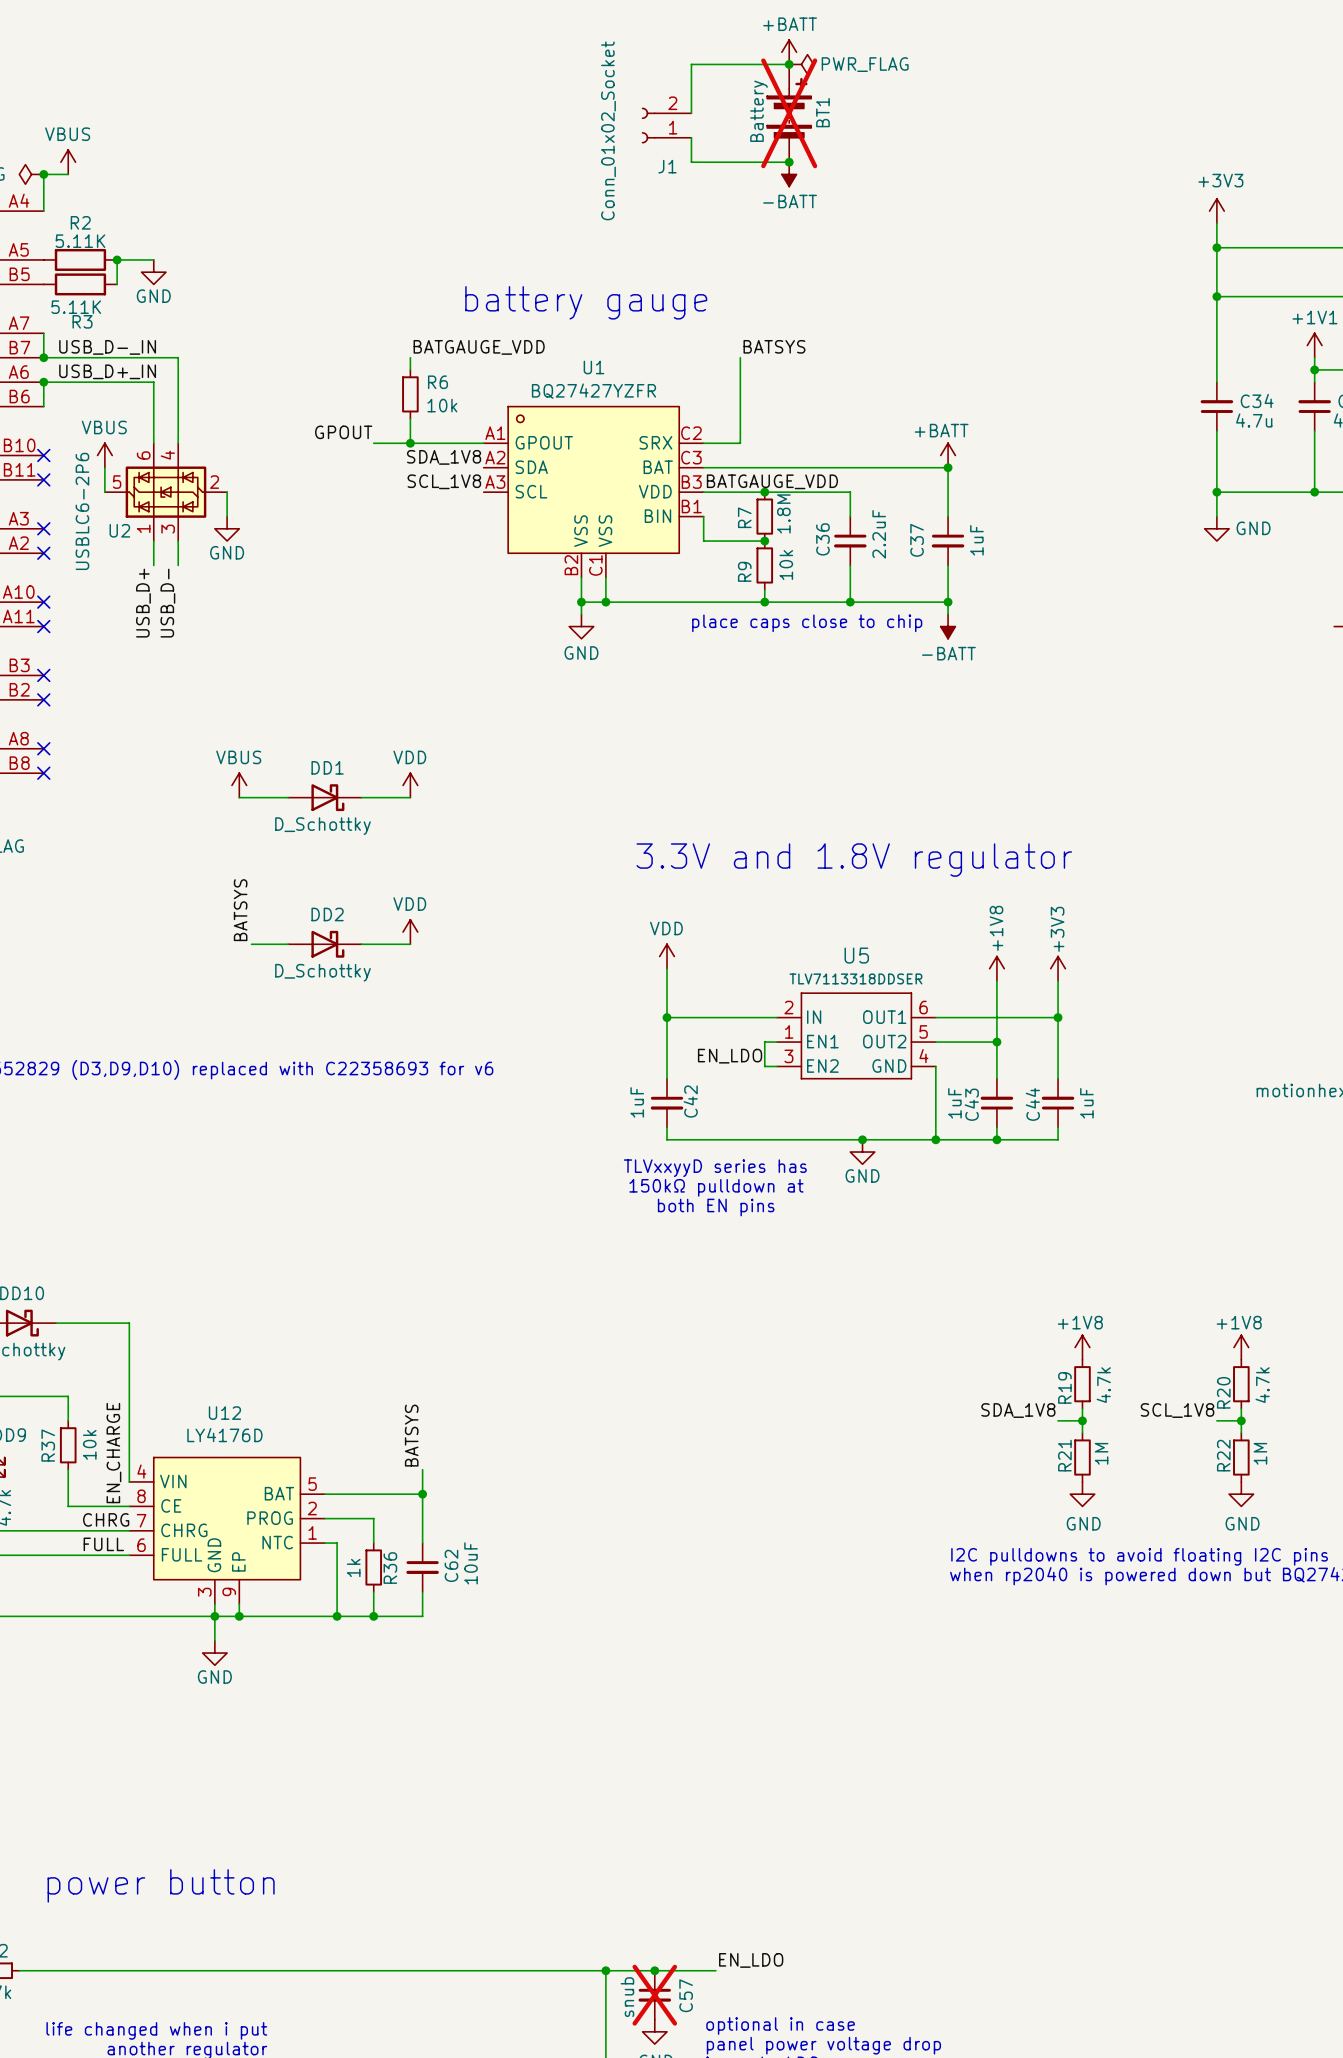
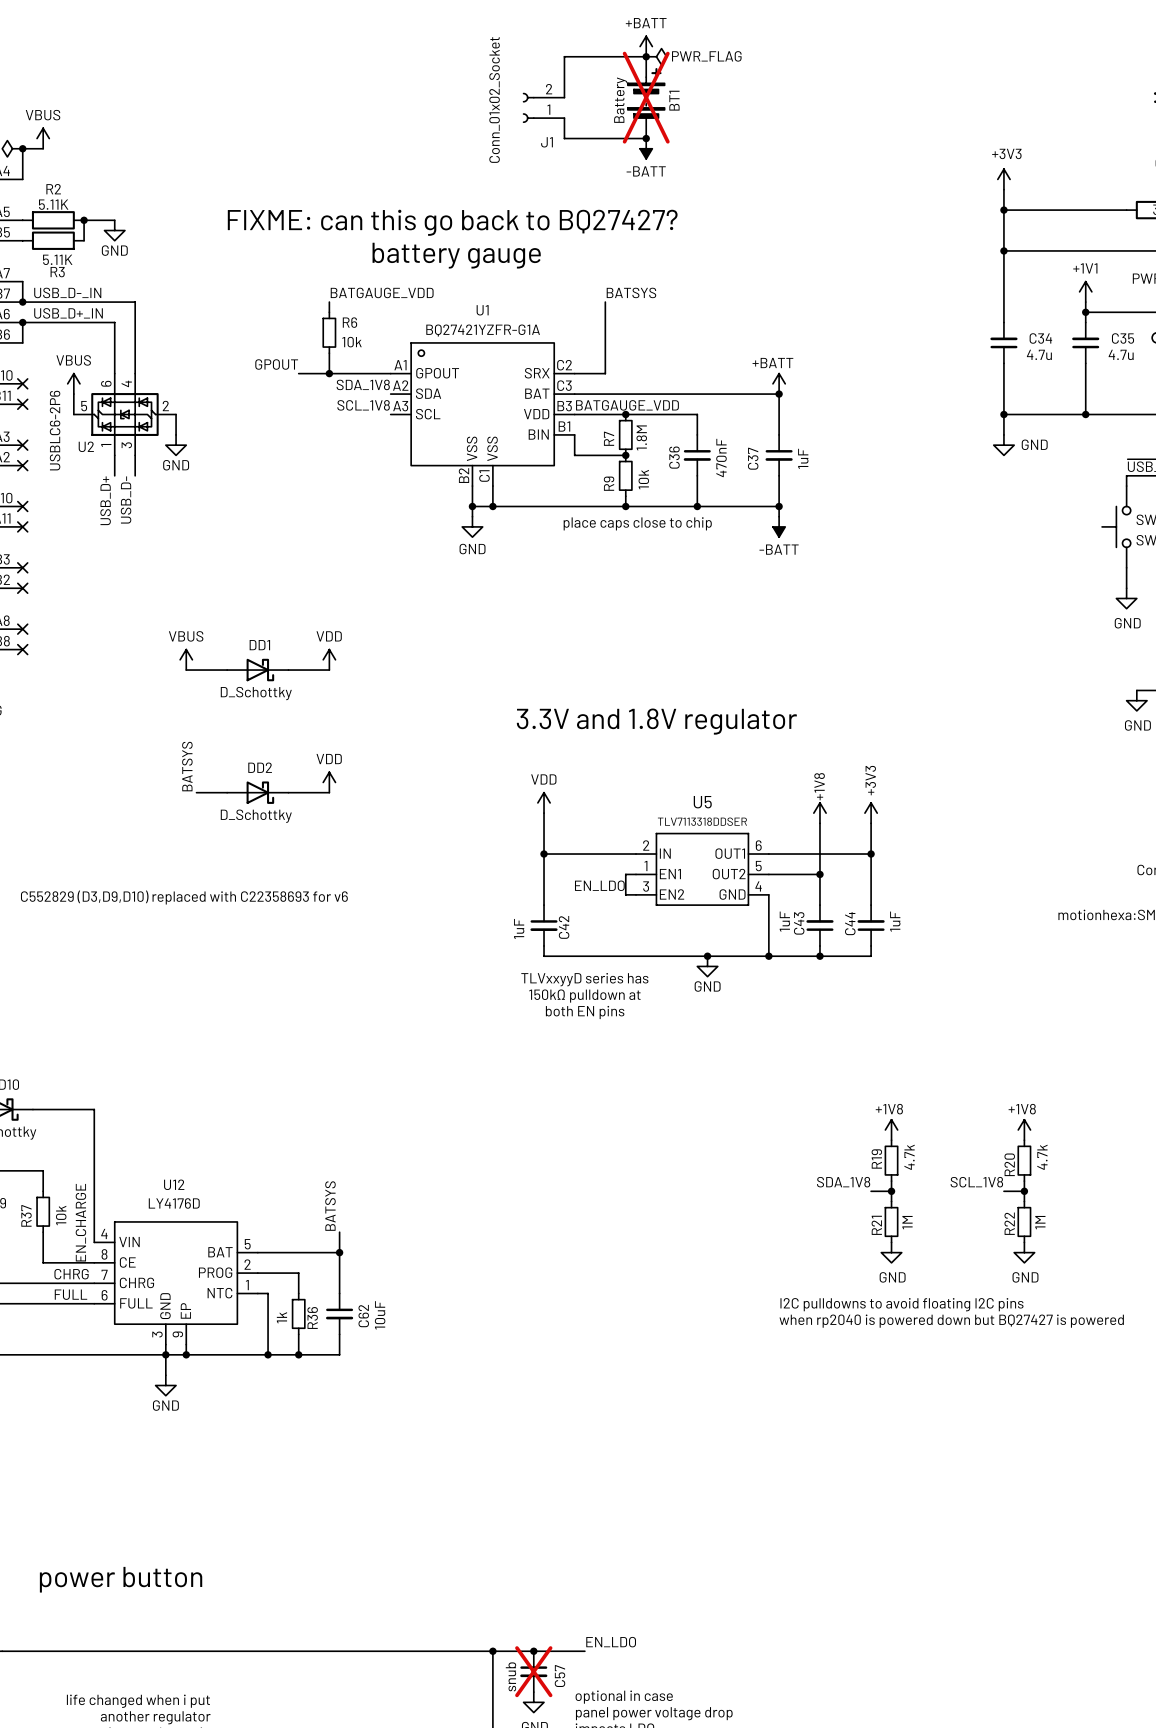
text: none -> FIXME: can this go back to BQ27427? (452, 222)
U1 value: BQ27427YZFR (593, 391) -> BQ27421YZFR-G1A (483, 330)
C36 value: 2.2uF (879, 534) -> 470nF (721, 457)

